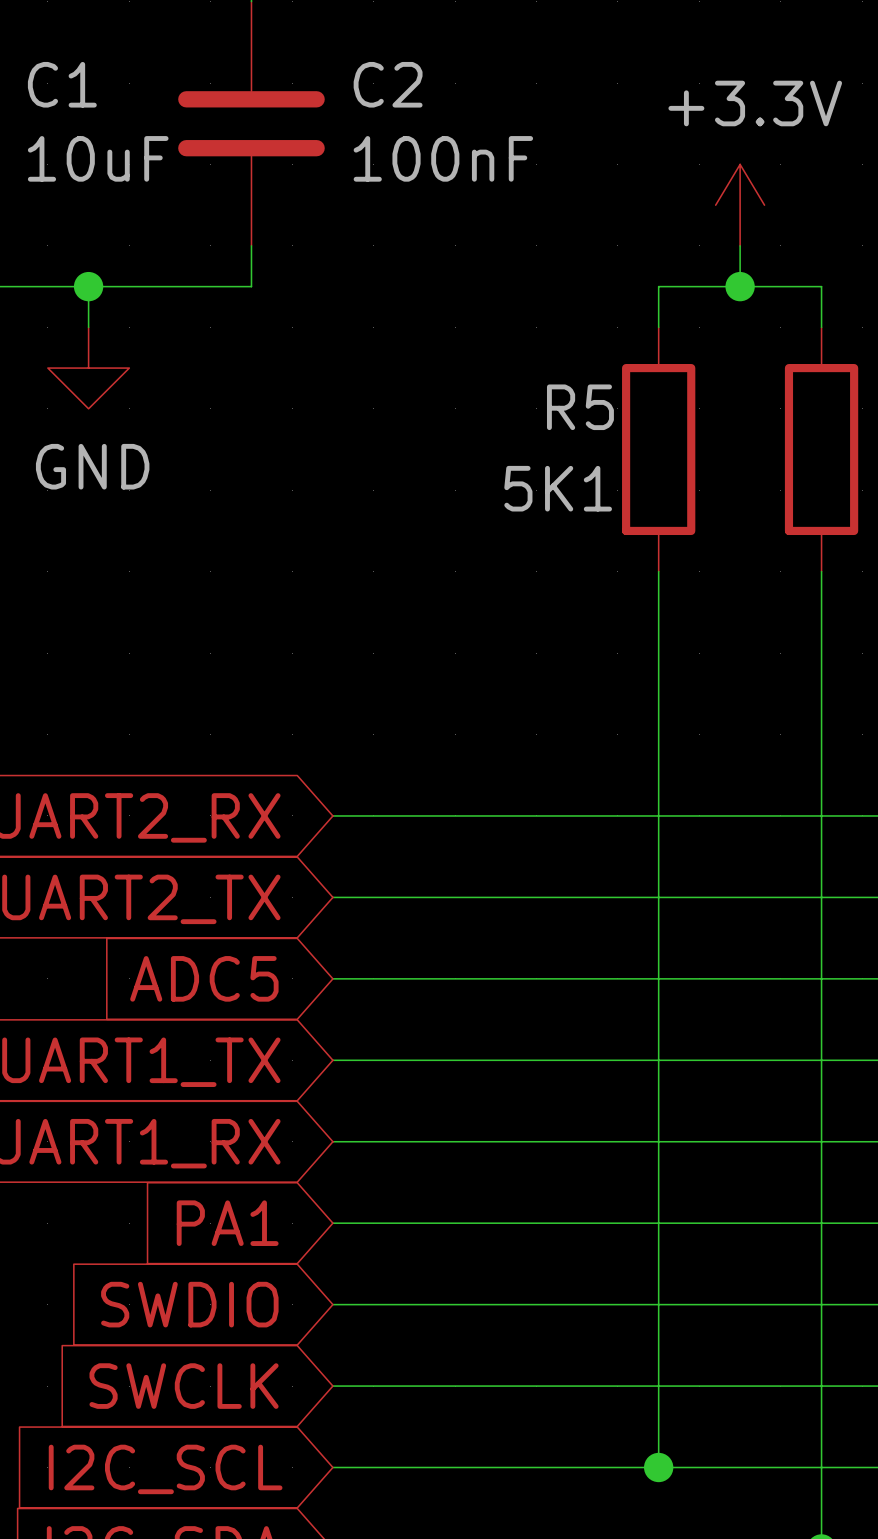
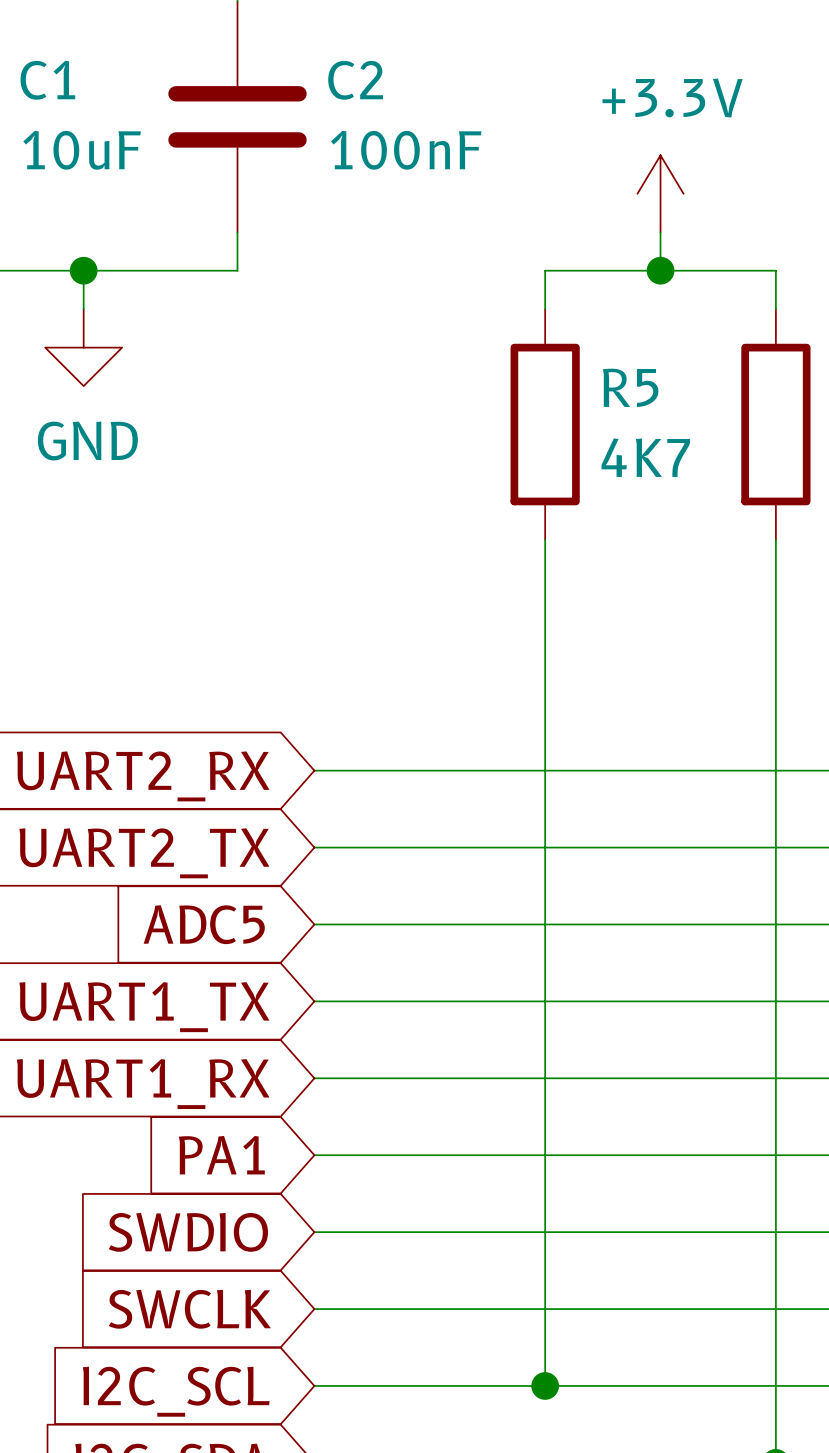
power symbol position: +3.3V (740, 205) -> +3.3V (660, 193)
wire: (740, 245) (740, 286) -> (660, 232) (660, 270)
wire: (658, 286) (658, 327) -> (622, 270) (545, 270) (545, 309)
junction position: (740, 286) -> (660, 270)
R5 name position: R5 (580, 407) -> R5 (630, 387)
R5 position: (658, 449) -> (545, 424)
R5 value: 5K1 (558, 488) -> 4K7 (645, 457)
wire: (658, 571) (658, 1467) -> (545, 539) (545, 1385)
junction position: (658, 1467) -> (545, 1385)

